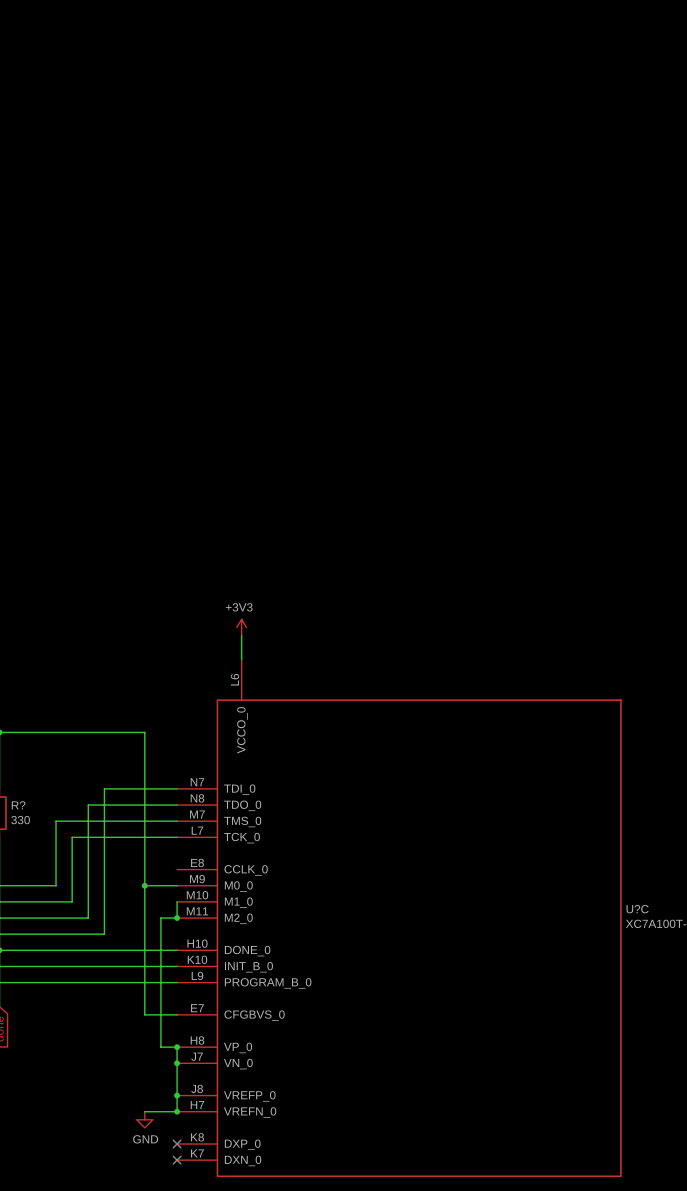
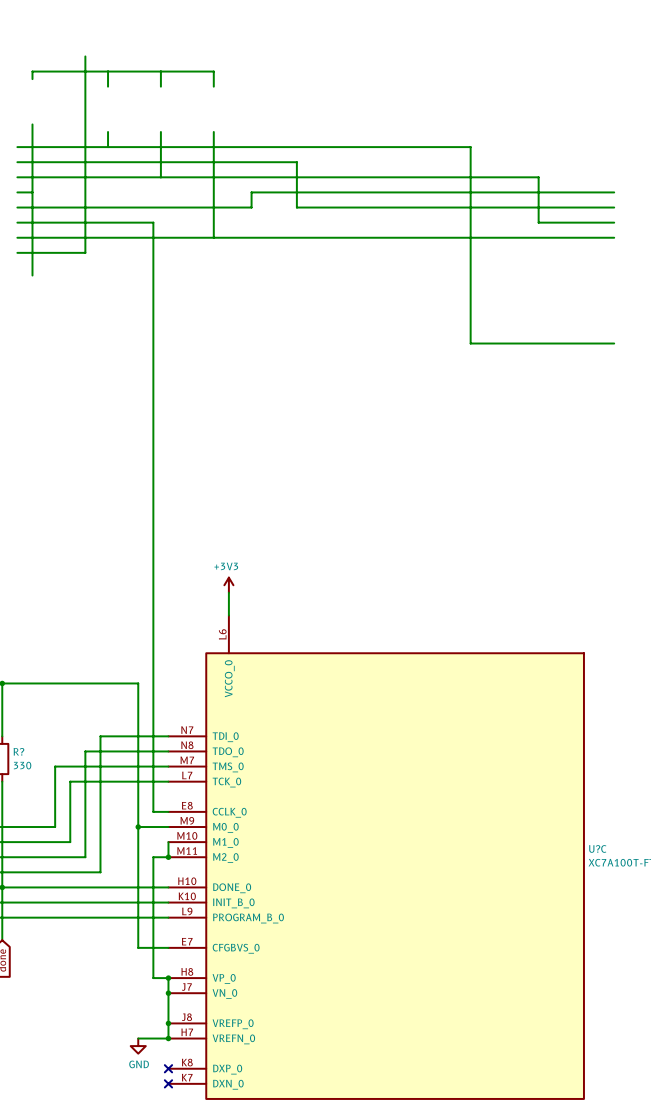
wire: none -> (85, 56) (85, 252) (17, 252)
wire: none -> (108, 71) (108, 86)
wire: none -> (160, 71) (160, 86)
wire: none -> (32, 79) (32, 71) (213, 71) (213, 86)
wire: none -> (32, 124) (32, 275)
wire: none -> (108, 131) (108, 147)
wire: none -> (160, 131) (160, 177)
wire: none -> (213, 131) (213, 237)
wire: none -> (17, 147) (470, 147) (470, 343) (614, 343)
wire: none -> (17, 162) (296, 162) (296, 207) (614, 207)
wire: none -> (17, 177) (538, 177) (538, 222) (614, 222)
wire: none -> (17, 192) (32, 192)
wire: none -> (614, 192) (251, 192) (251, 207) (17, 207)
wire: none -> (17, 222) (153, 222) (153, 811) (168, 811)
wire: none -> (17, 237) (614, 237)

